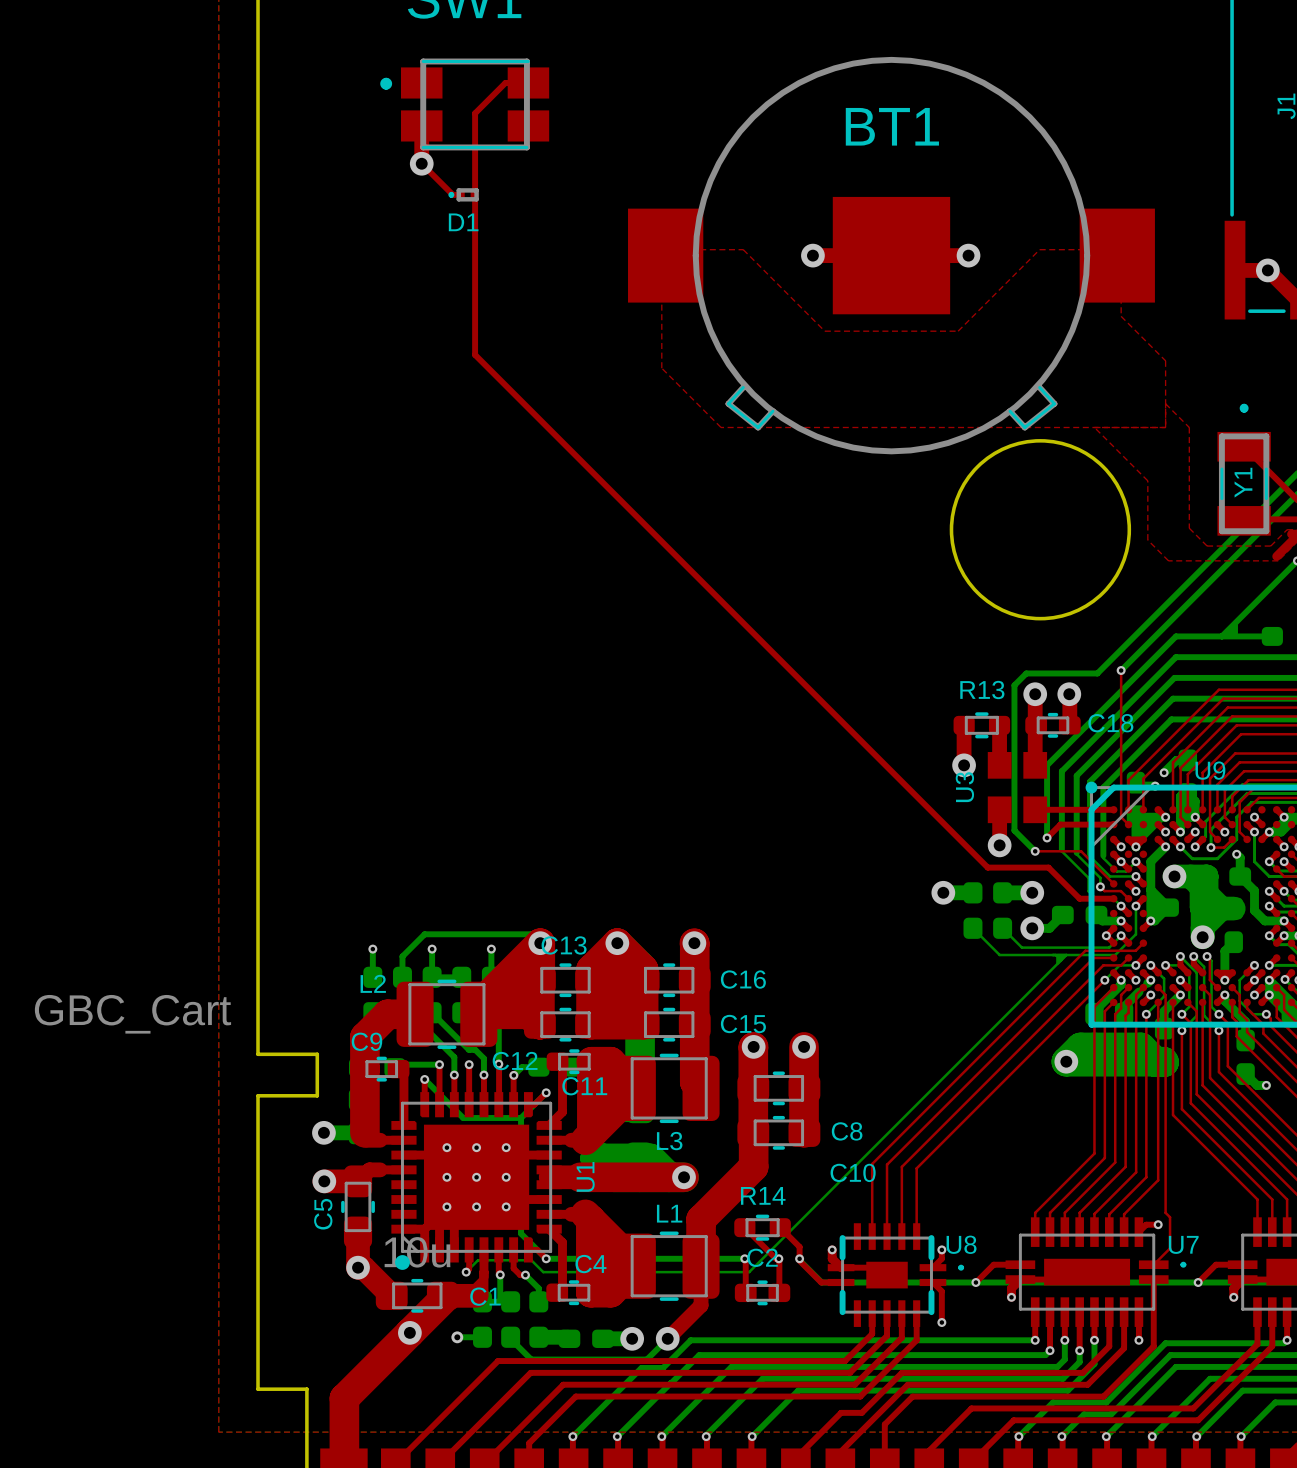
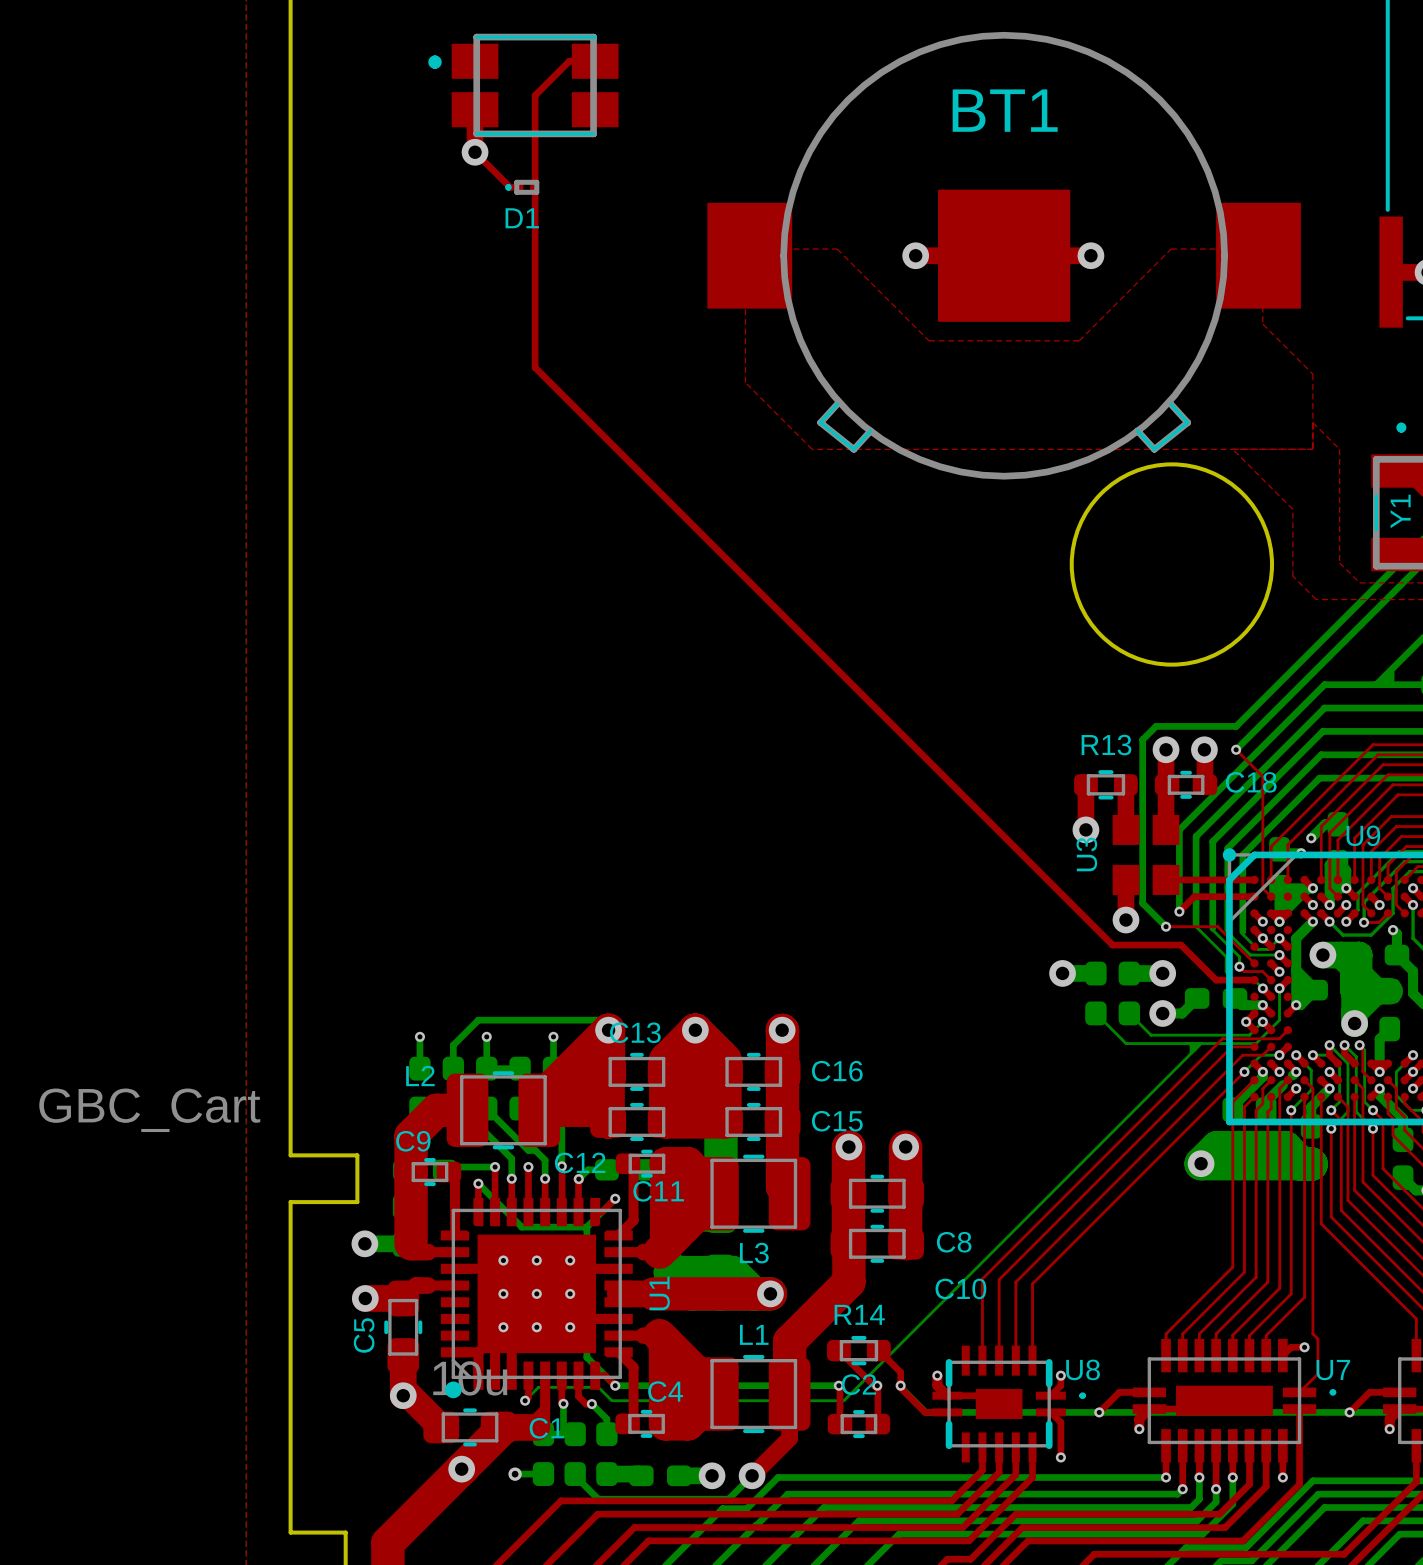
top track: (1121, 670) (1121, 717) -> (1236, 749) (1262, 776)
bottom track: none -> (1262, 723) (1236, 749)
via position: (1121, 670) -> (1236, 749)

